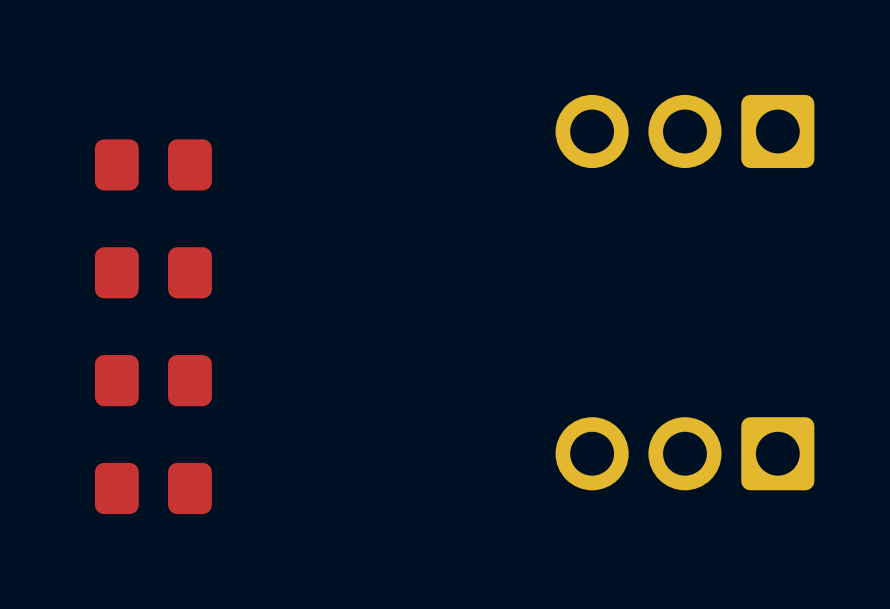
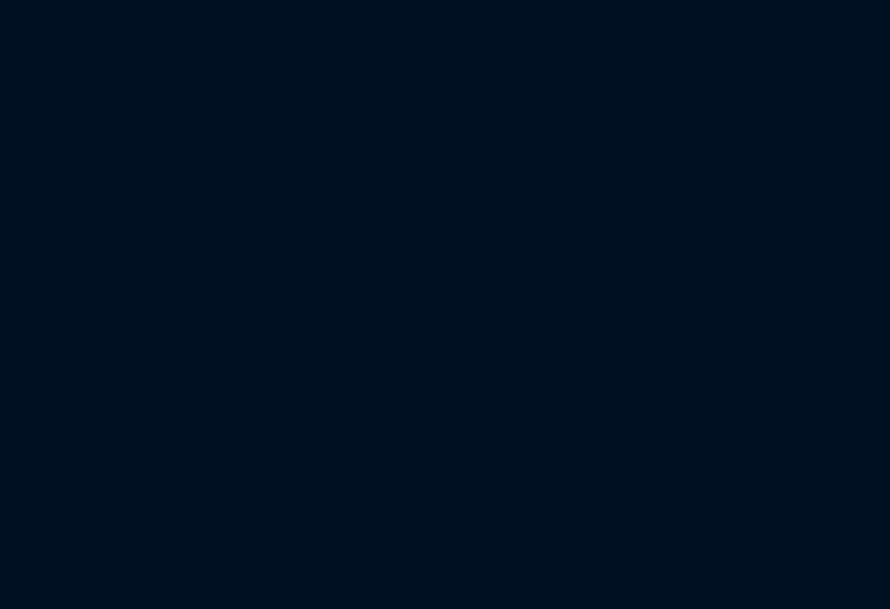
part: (684, 131) -> none
part: (153, 164) -> none
part: (153, 272) -> none
part: (153, 380) -> none
part: (684, 453) -> none
part: (153, 488) -> none

